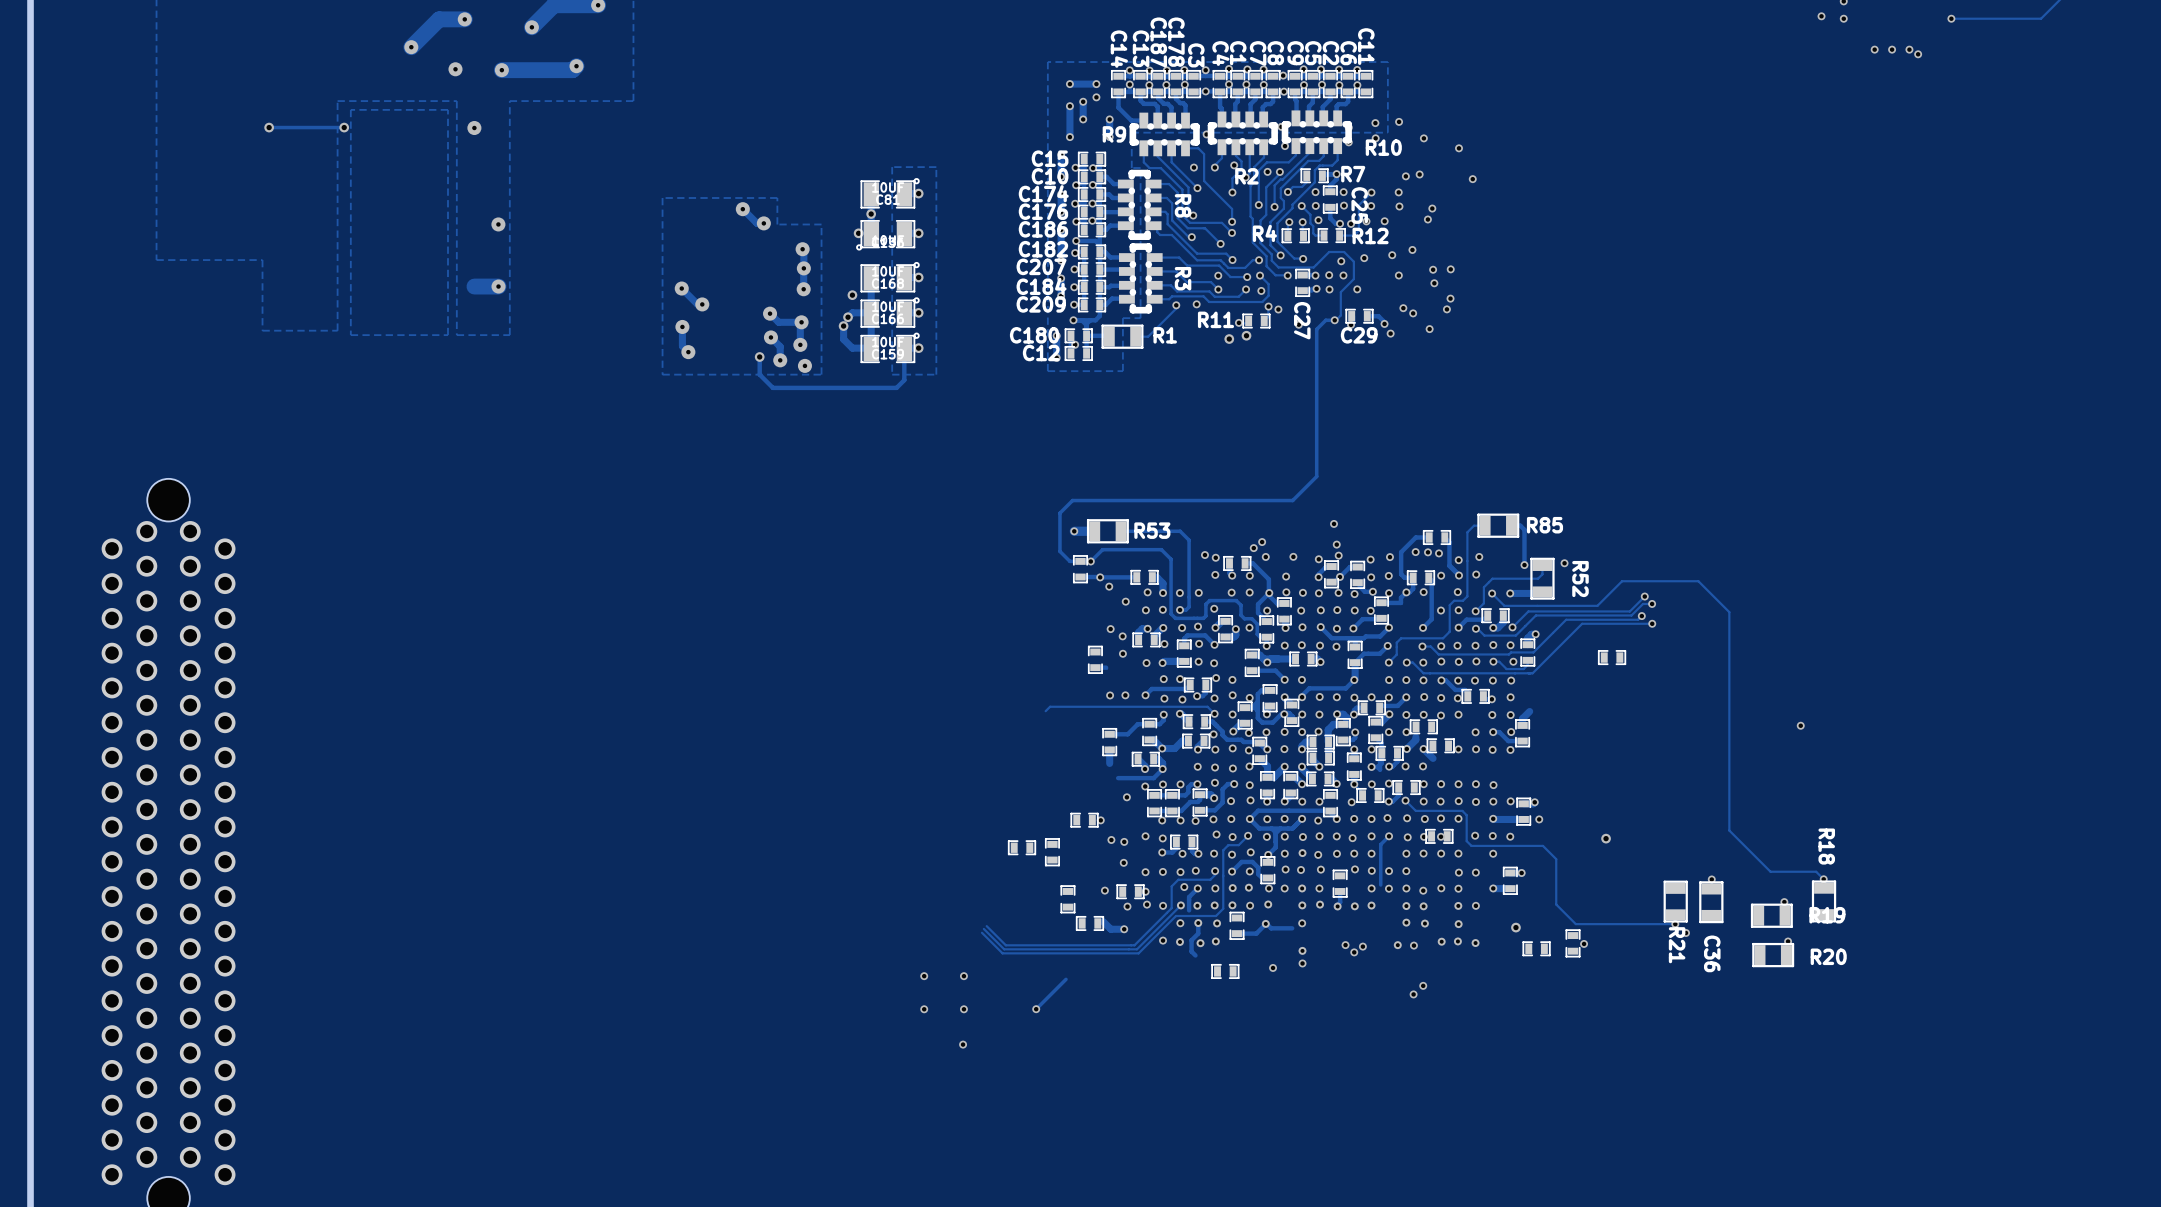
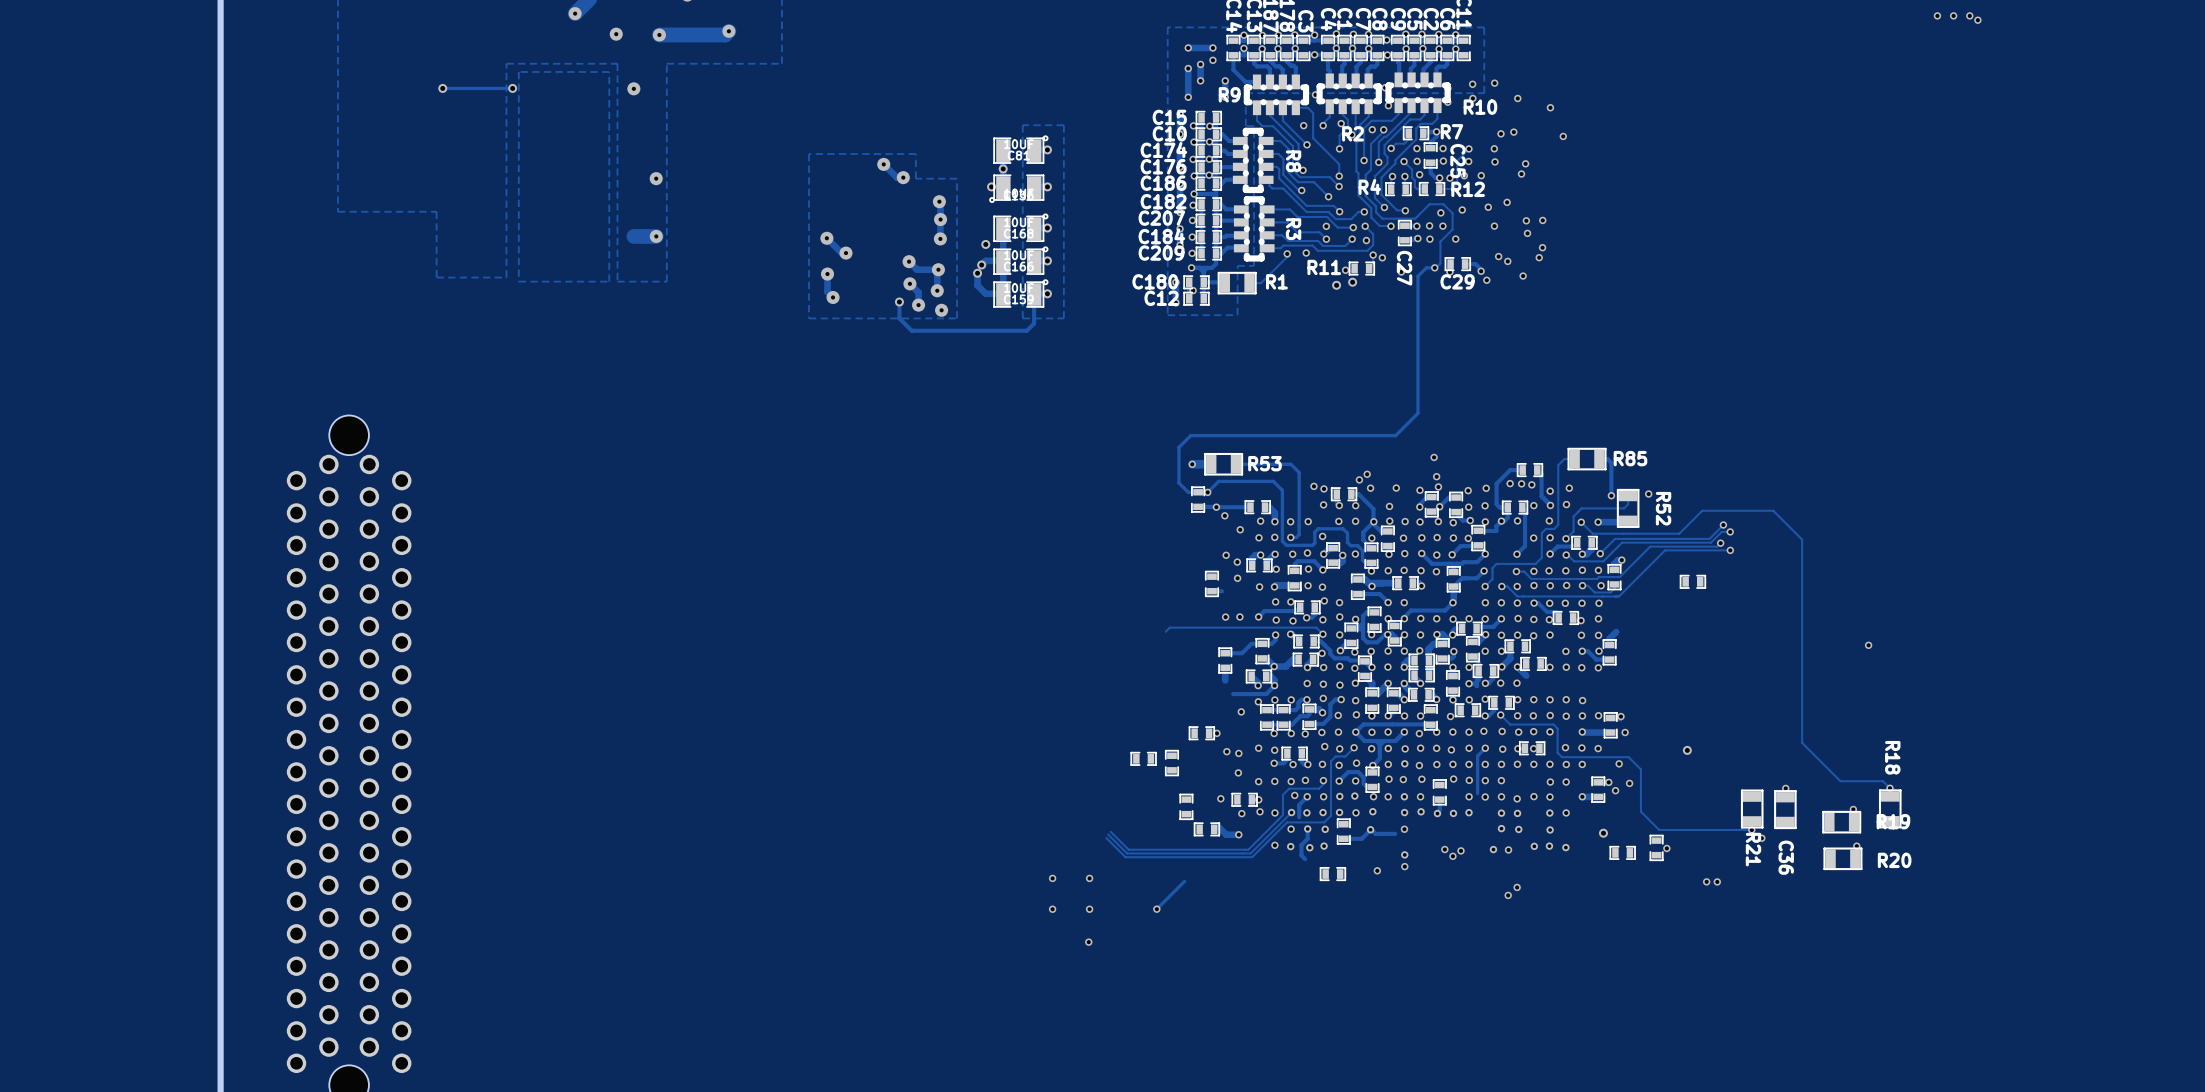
via: none -> (1485, 764)
via: none -> (1566, 764)
via: none -> (1619, 763)
via: none -> (1629, 783)
via: none -> (1615, 790)
via: none -> (1706, 881)
via: none -> (1717, 881)

